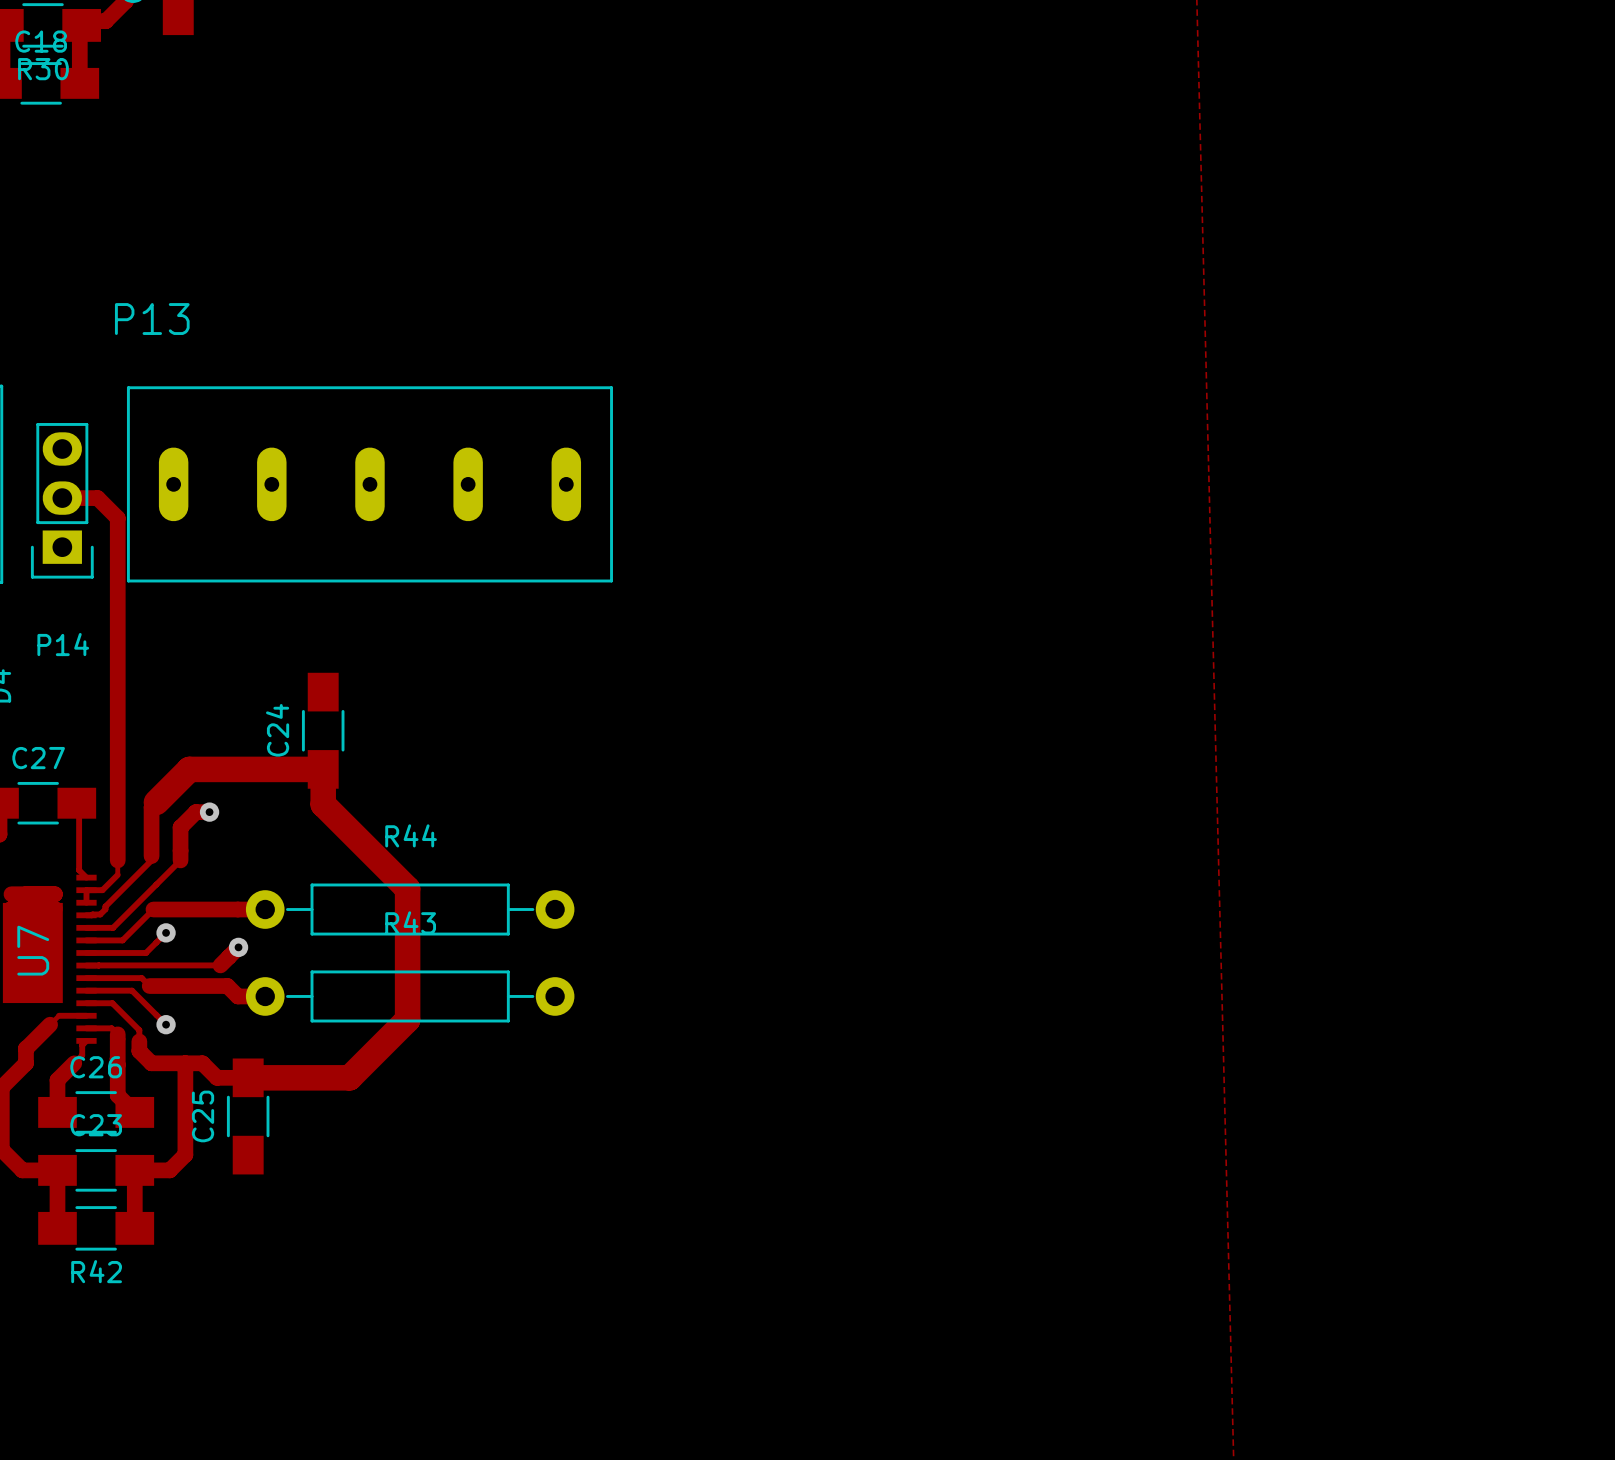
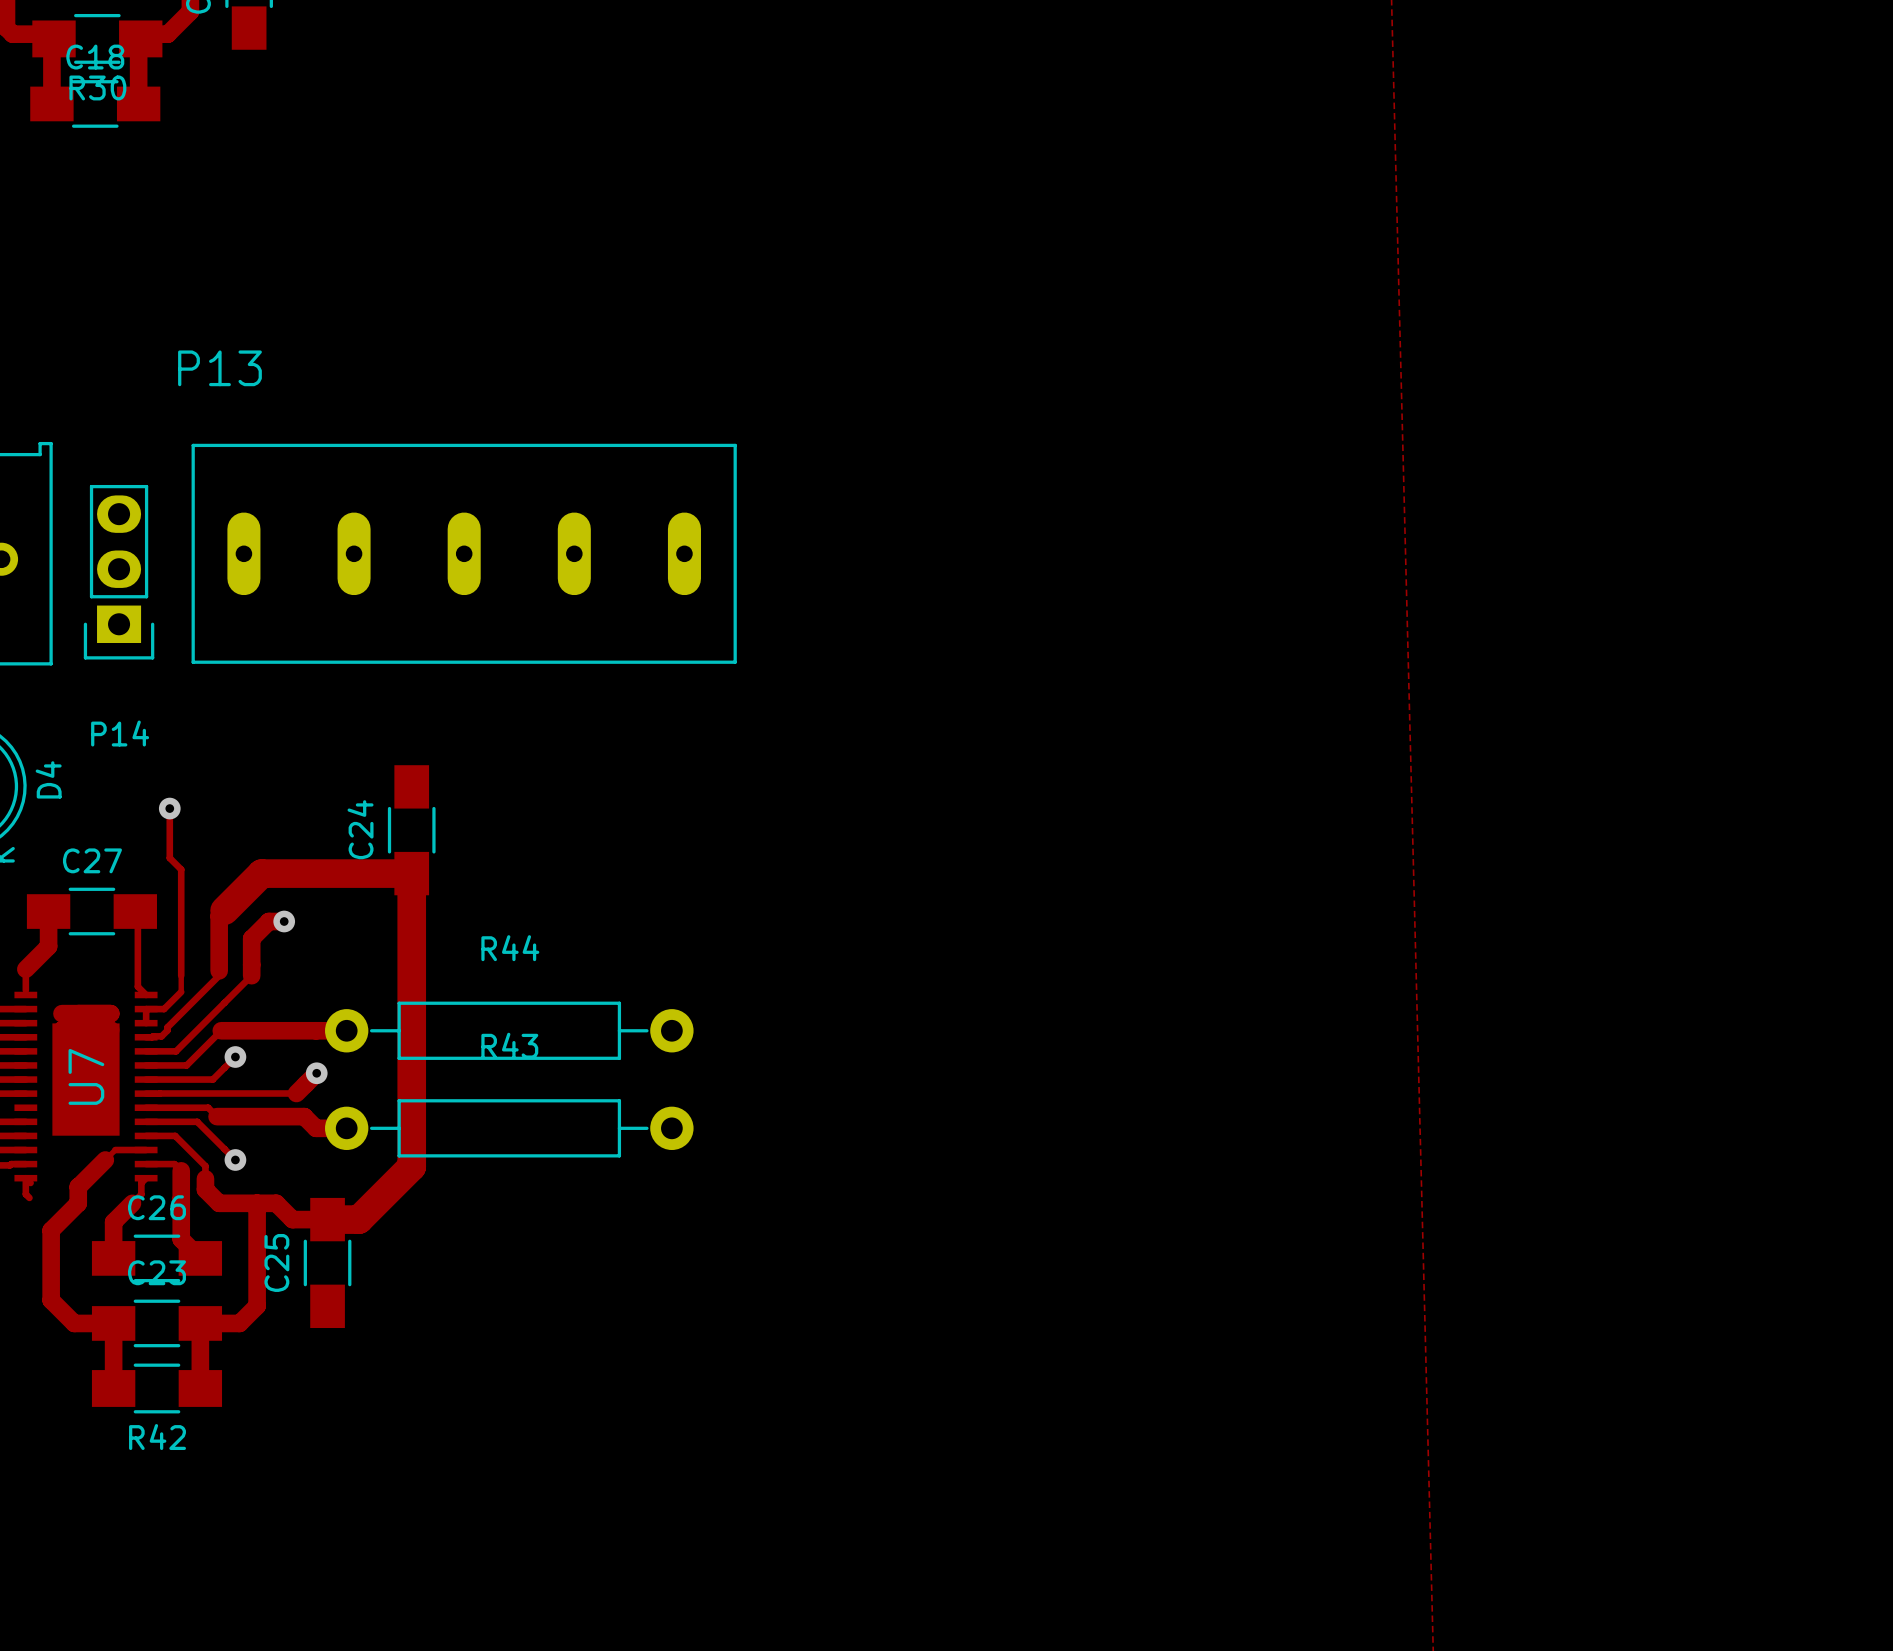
track: (62, 498) (97, 498) (117, 518) (117, 765) -> (169, 808) (169, 858) (181, 869)
via: none -> (169, 808)
track width: thick (117, 765) (117, 860) -> thin (181, 869) (181, 975)
track: (323, 804) (407, 888) (407, 1019) (349, 1077) (276, 1077) -> (411, 912) (411, 1166) (358, 1219)

